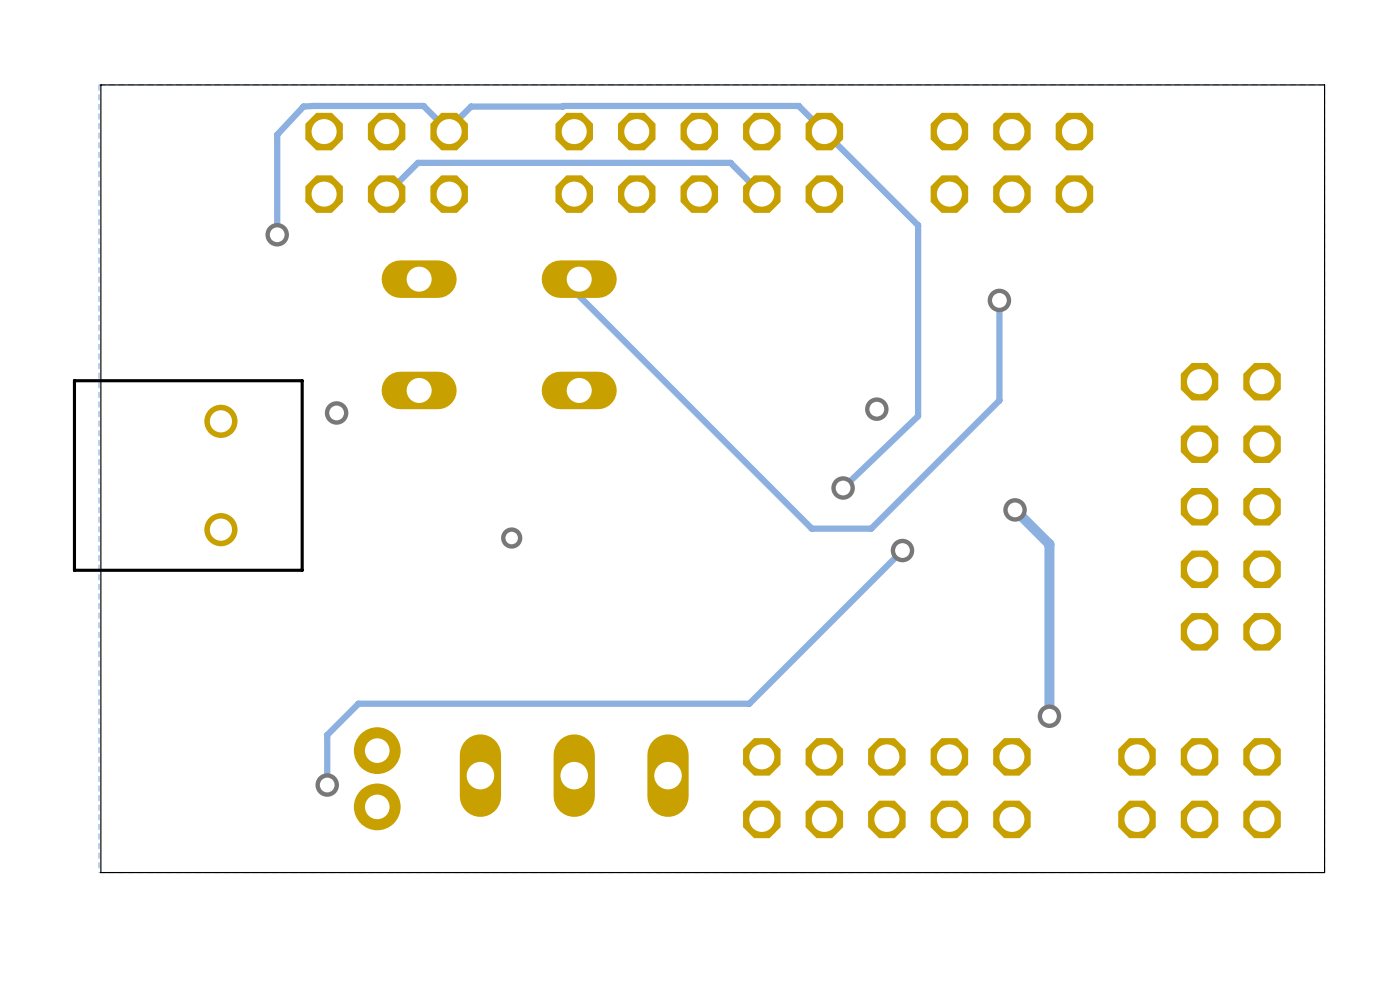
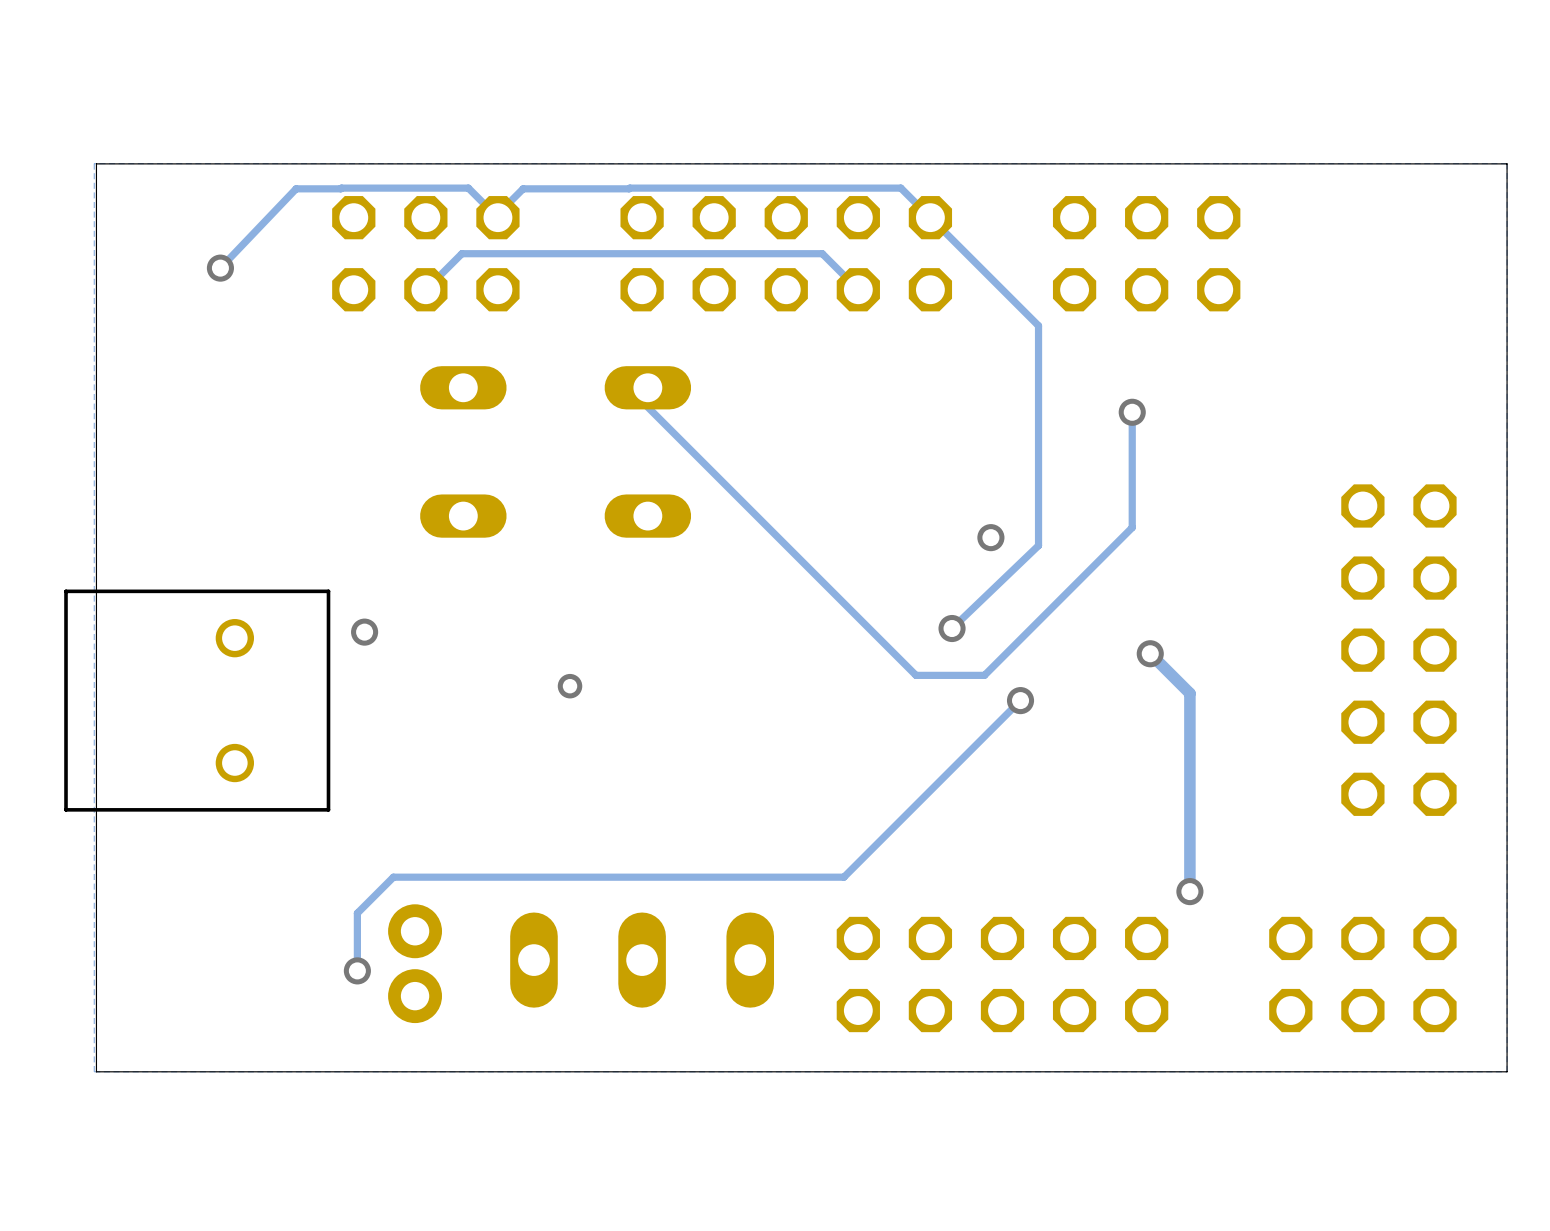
track: (313, 105) (303, 106) (277, 134) (277, 234) -> (341, 188) (296, 188) (220, 268)
via position: (277, 234) -> (220, 268)
via position: (336, 412) -> (364, 632)
part position: (188, 475) -> (197, 700)

